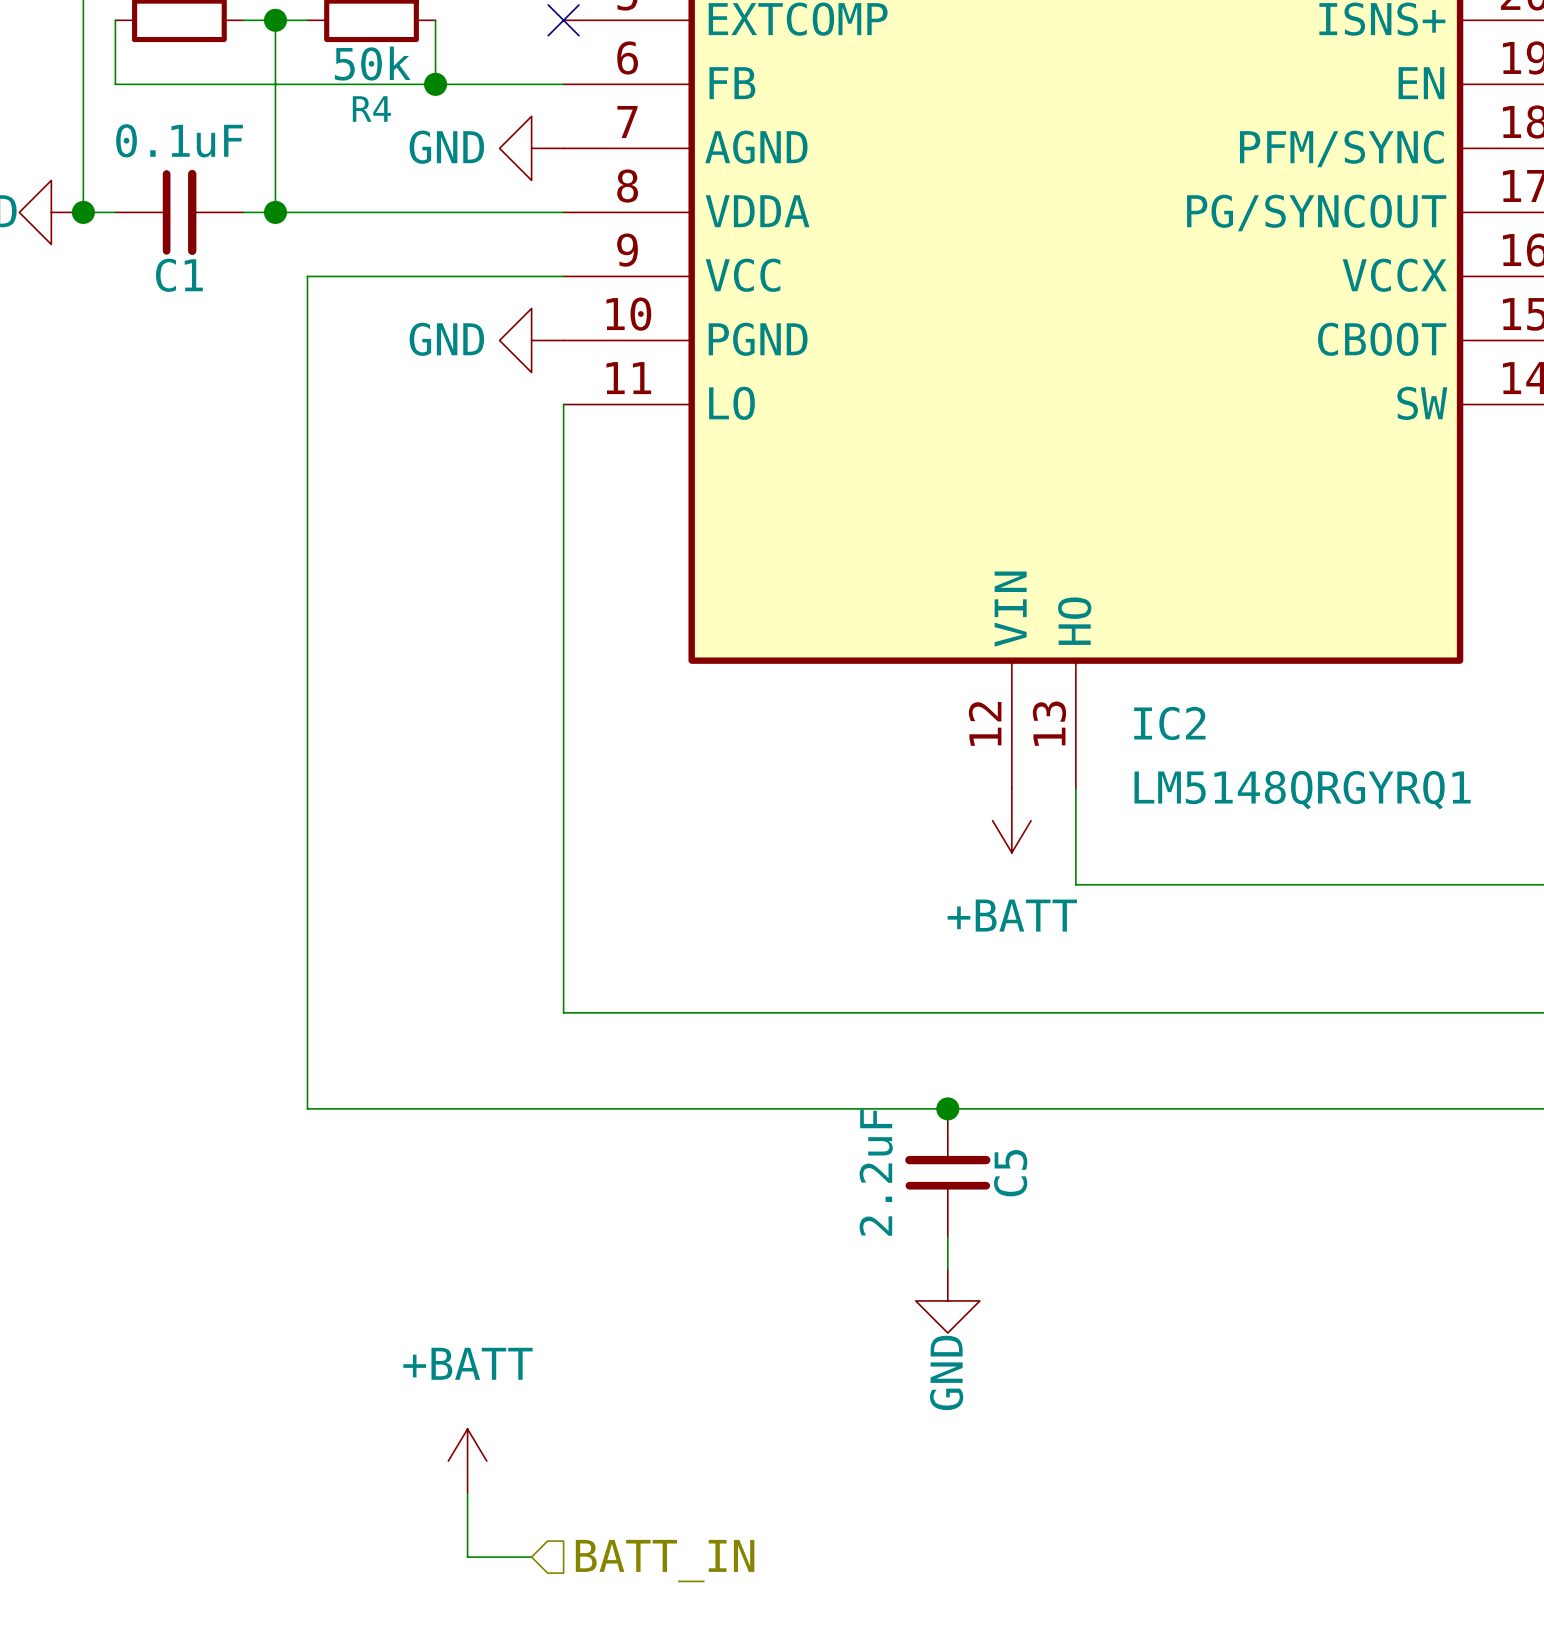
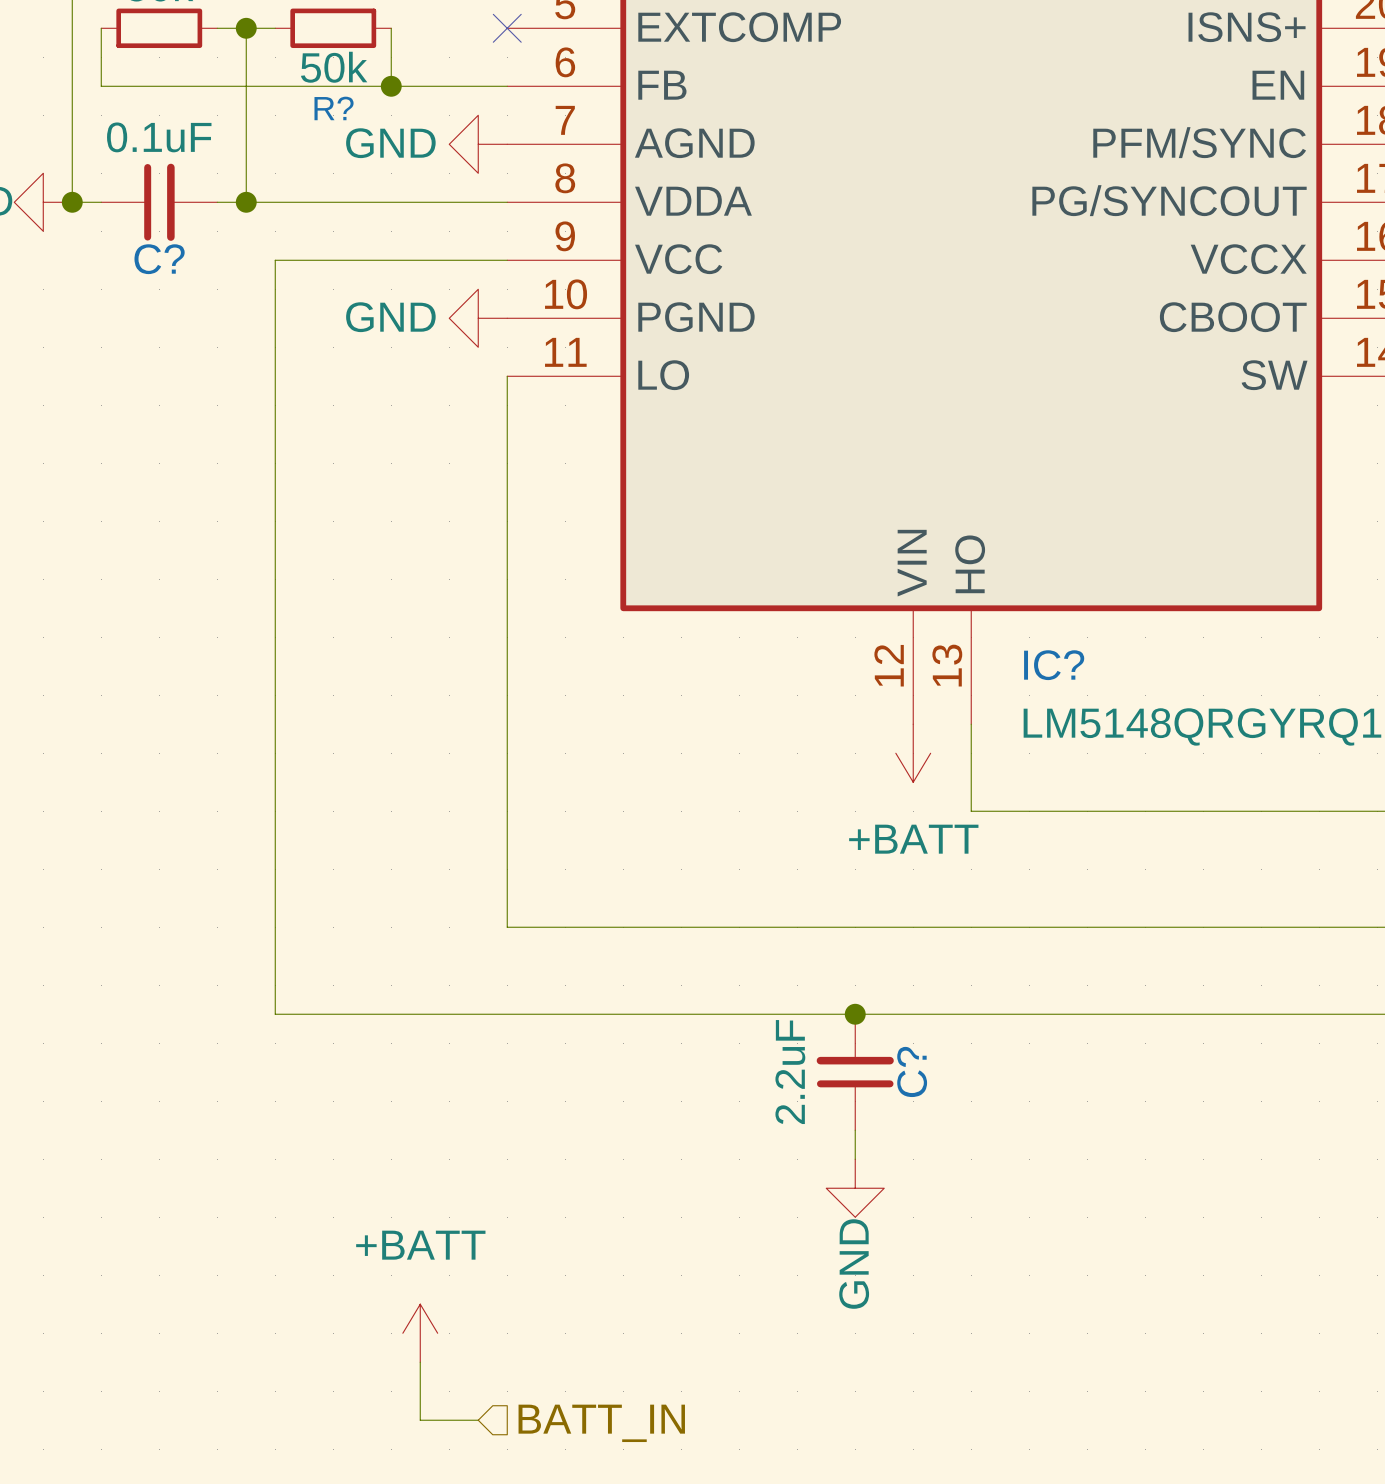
R4 name: R4 (371, 109) -> R? (334, 108)
C1 name: C1 (179, 275) -> C? (159, 259)
IC2 name: IC2 (1169, 723) -> IC? (1054, 665)
C5 name: C5 (1010, 1173) -> C? (912, 1071)

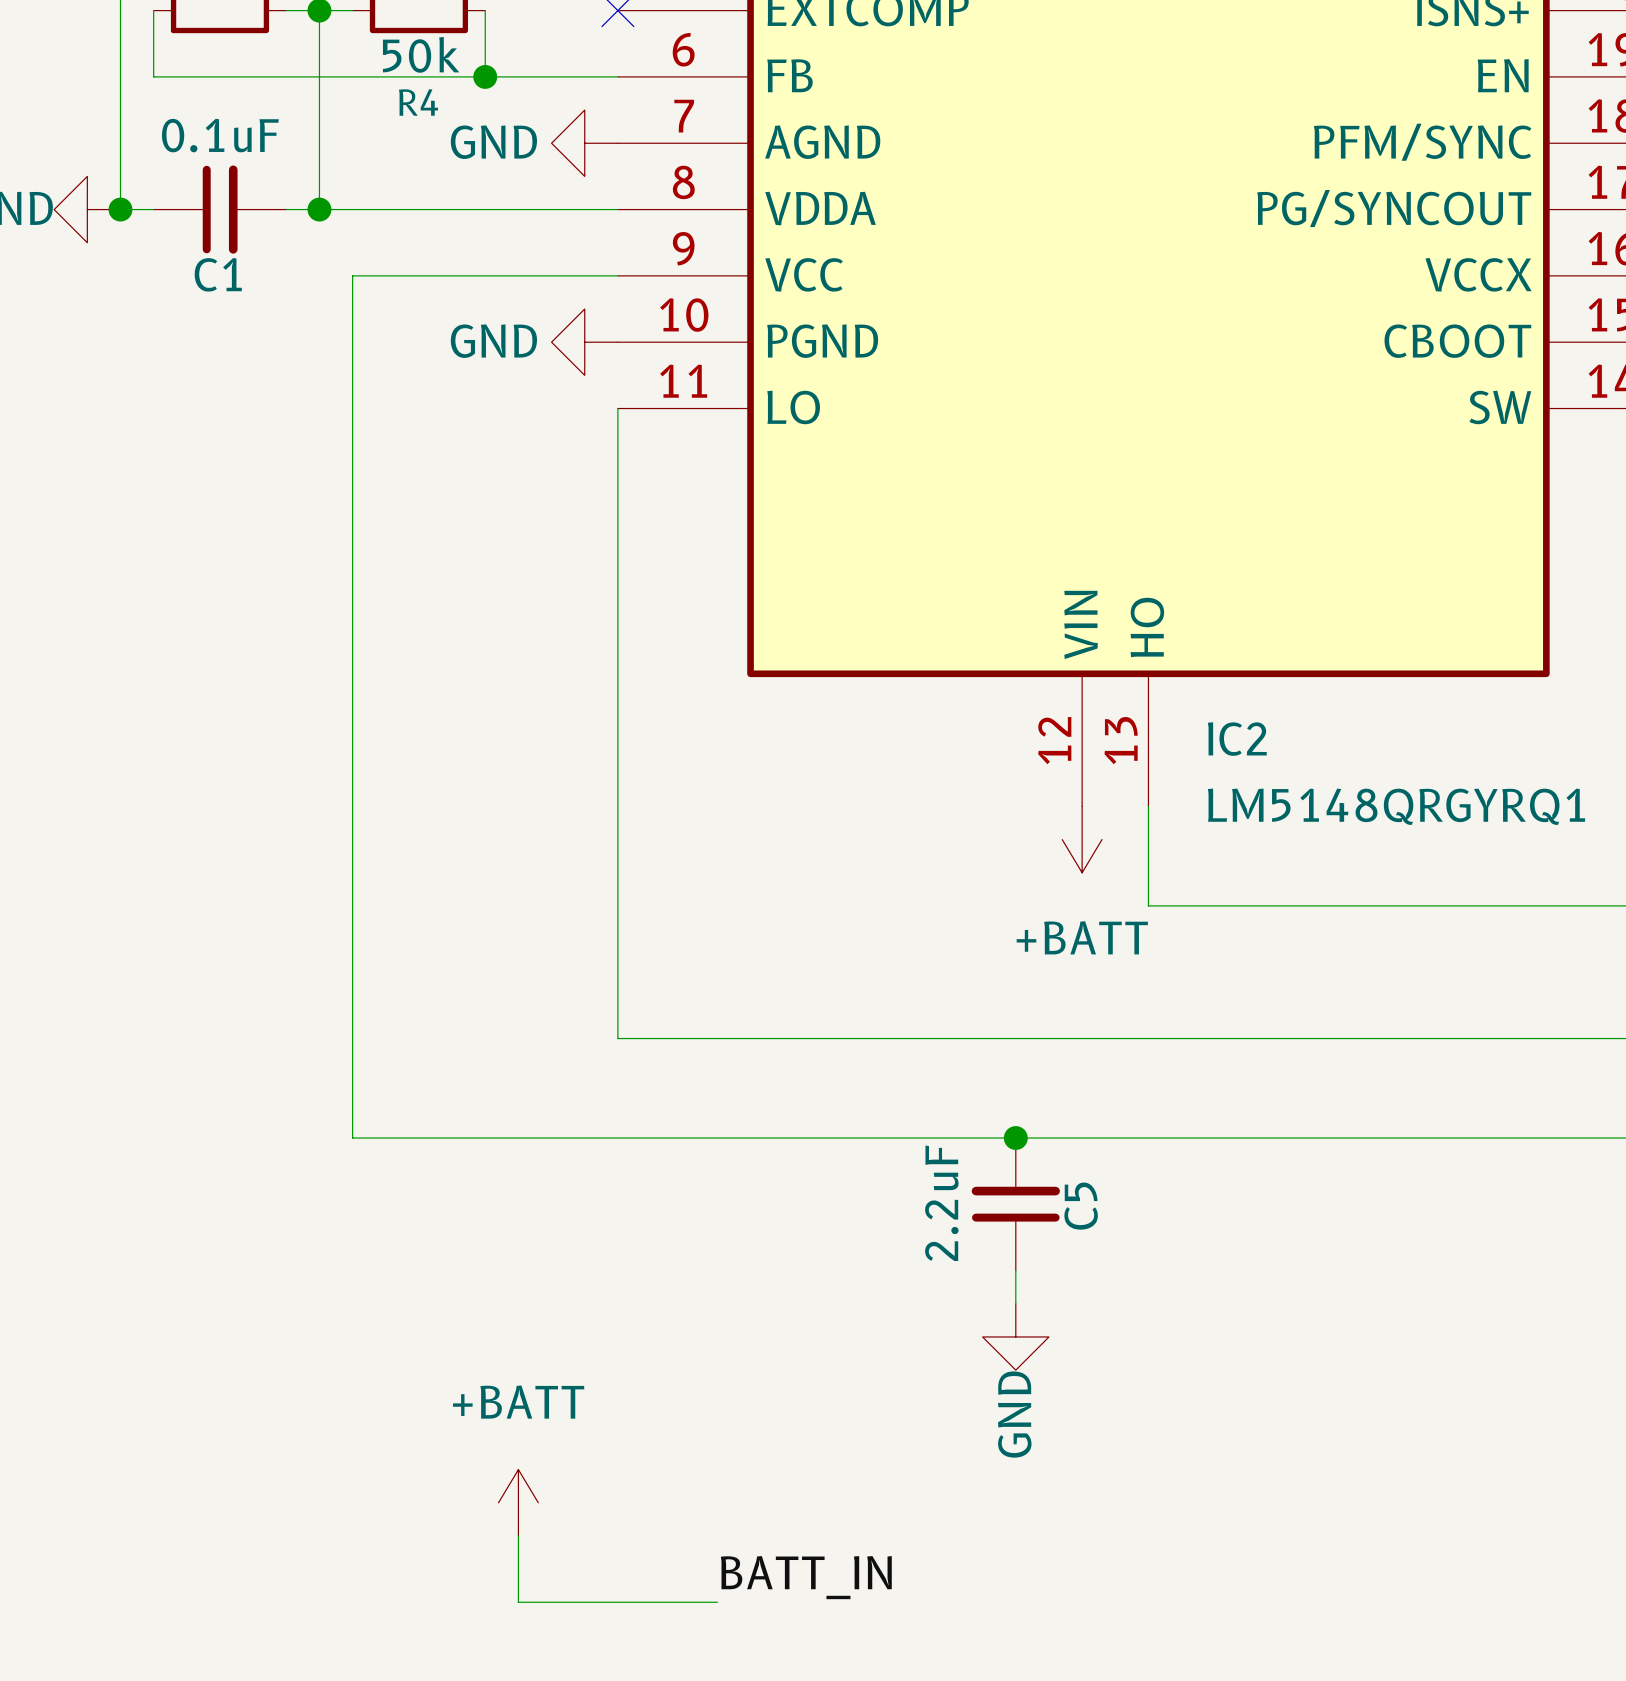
R? name: R? (334, 108) -> R4 (418, 102)
C? name: C? (159, 259) -> C1 (218, 274)
IC? name: IC? (1054, 665) -> IC2 (1237, 739)
C? name: C? (912, 1071) -> C5 (1081, 1206)
label: none -> BATT_IN (806, 1577)
wire: none -> (584, 1602) (717, 1602)
hierarchical label: BATT_IN (601, 1423) -> none

